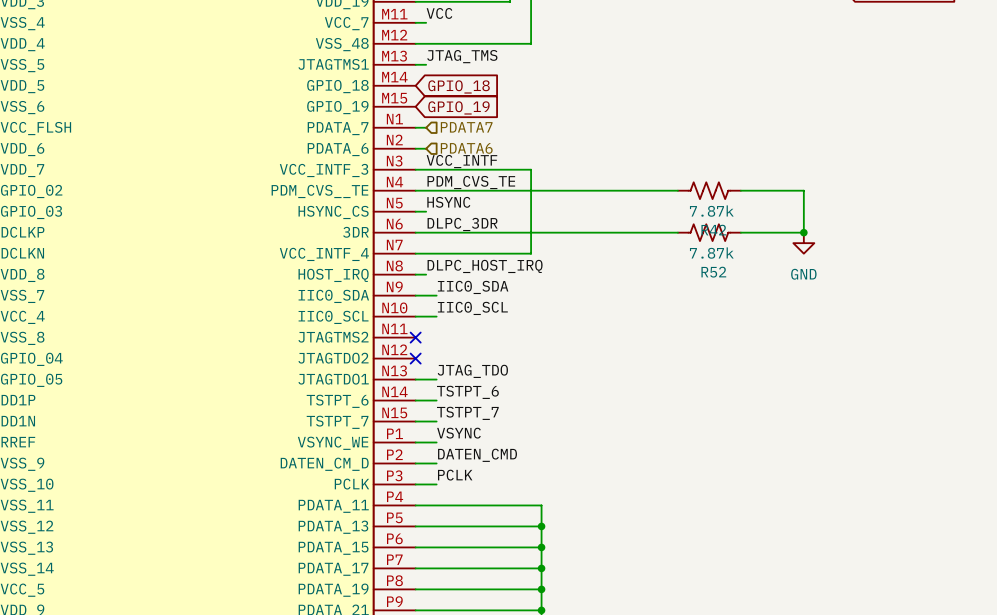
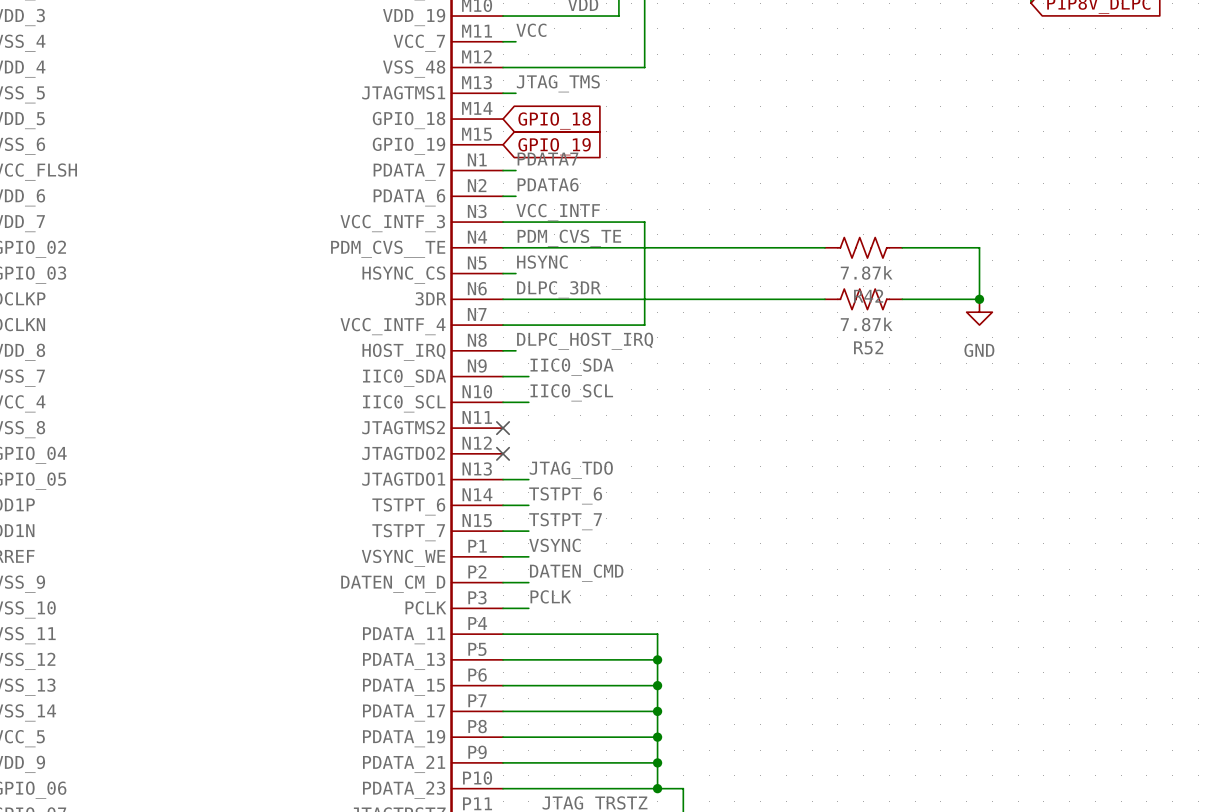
label: none -> PDATA7 (548, 159)
hierarchical label: PDATA7 (466, 127) -> none
label: none -> PDATA6 (548, 184)
hierarchical label: PDATA6 (466, 148) -> none

